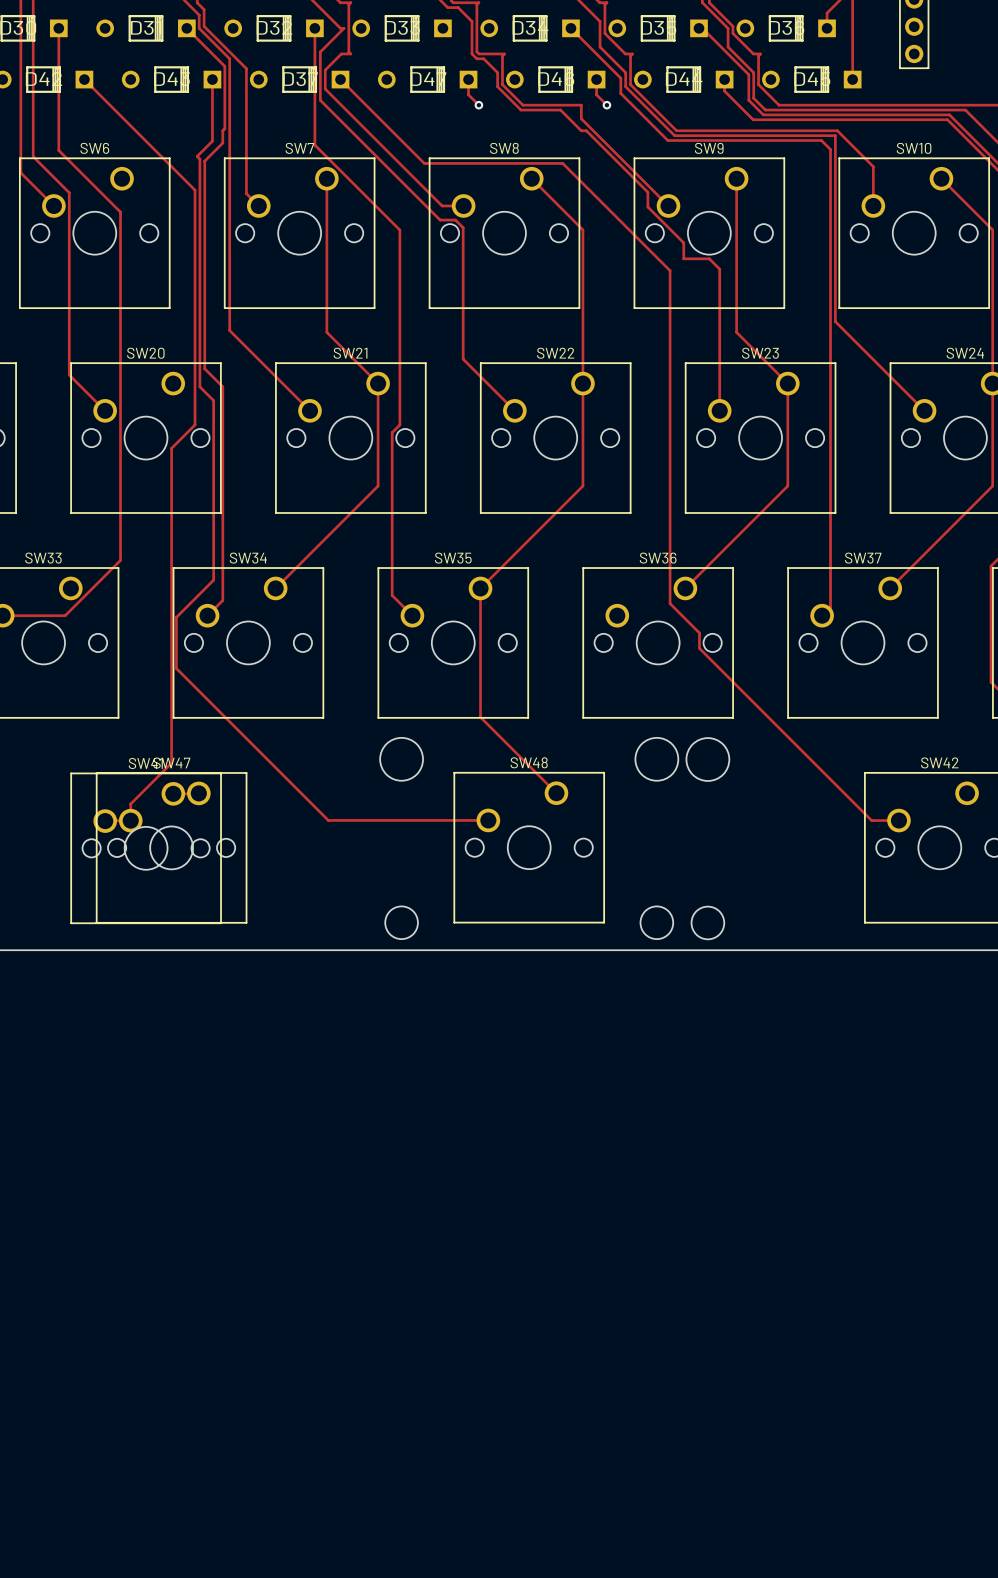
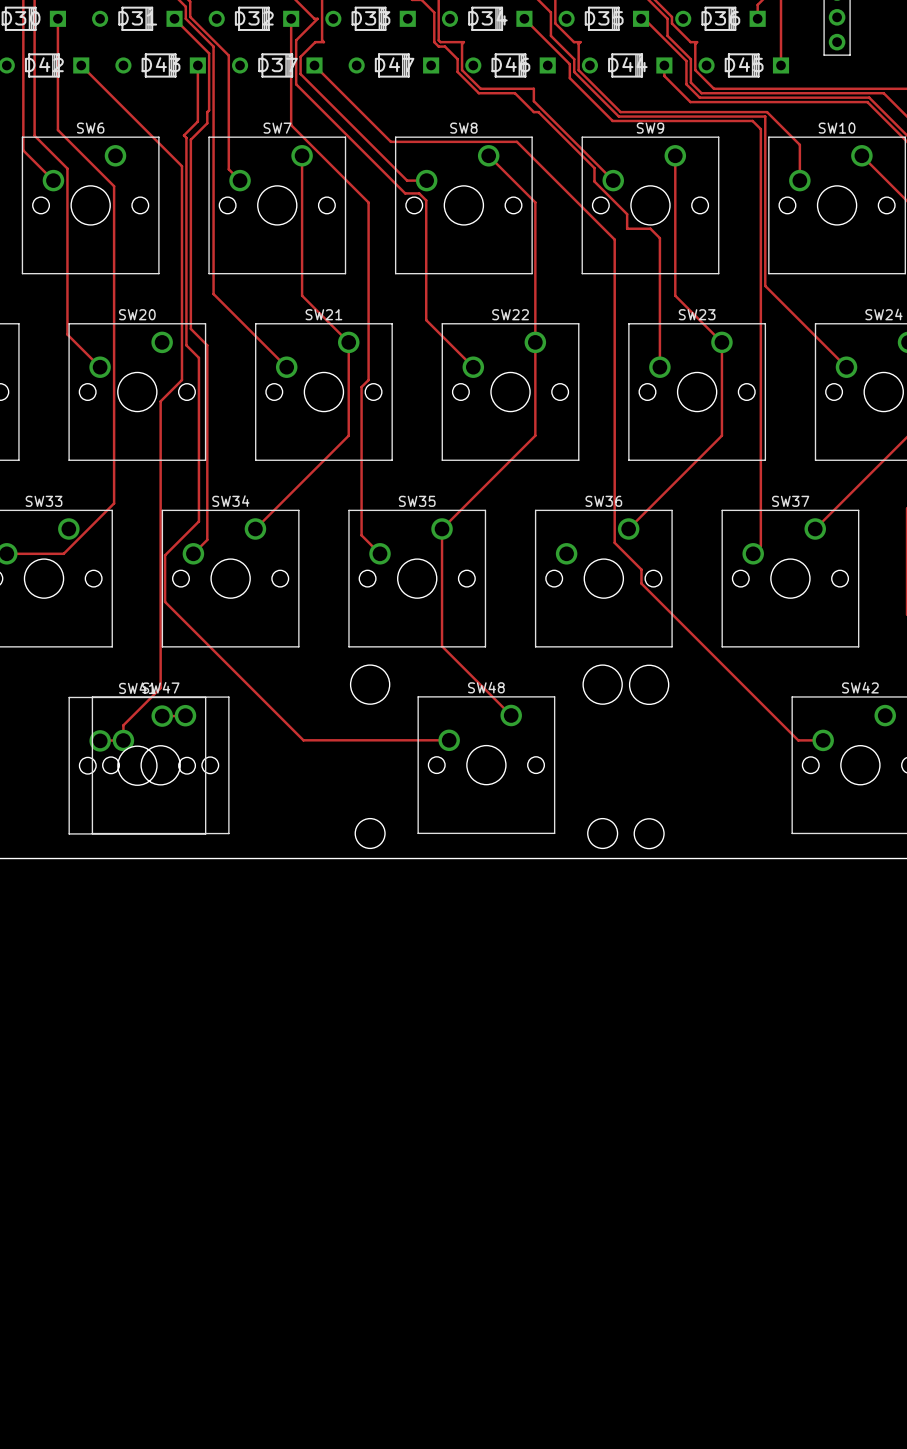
track: (468, 79) (468, 94) (478, 105) -> none
track: (596, 79) (596, 94) (606, 105) -> none
via: (478, 105) -> none
via: (606, 105) -> none

